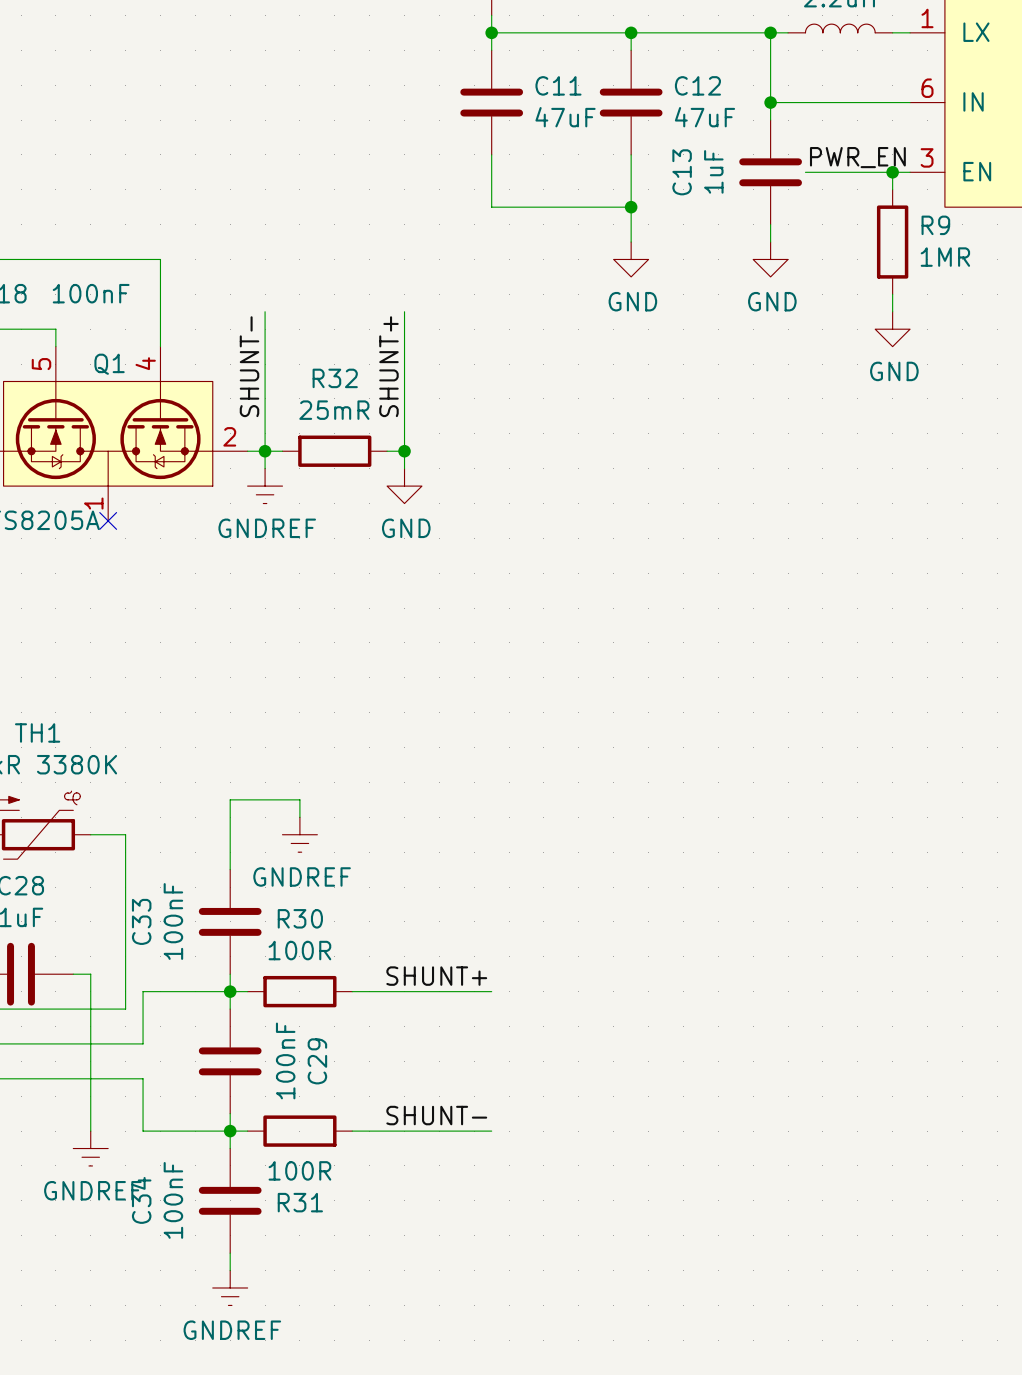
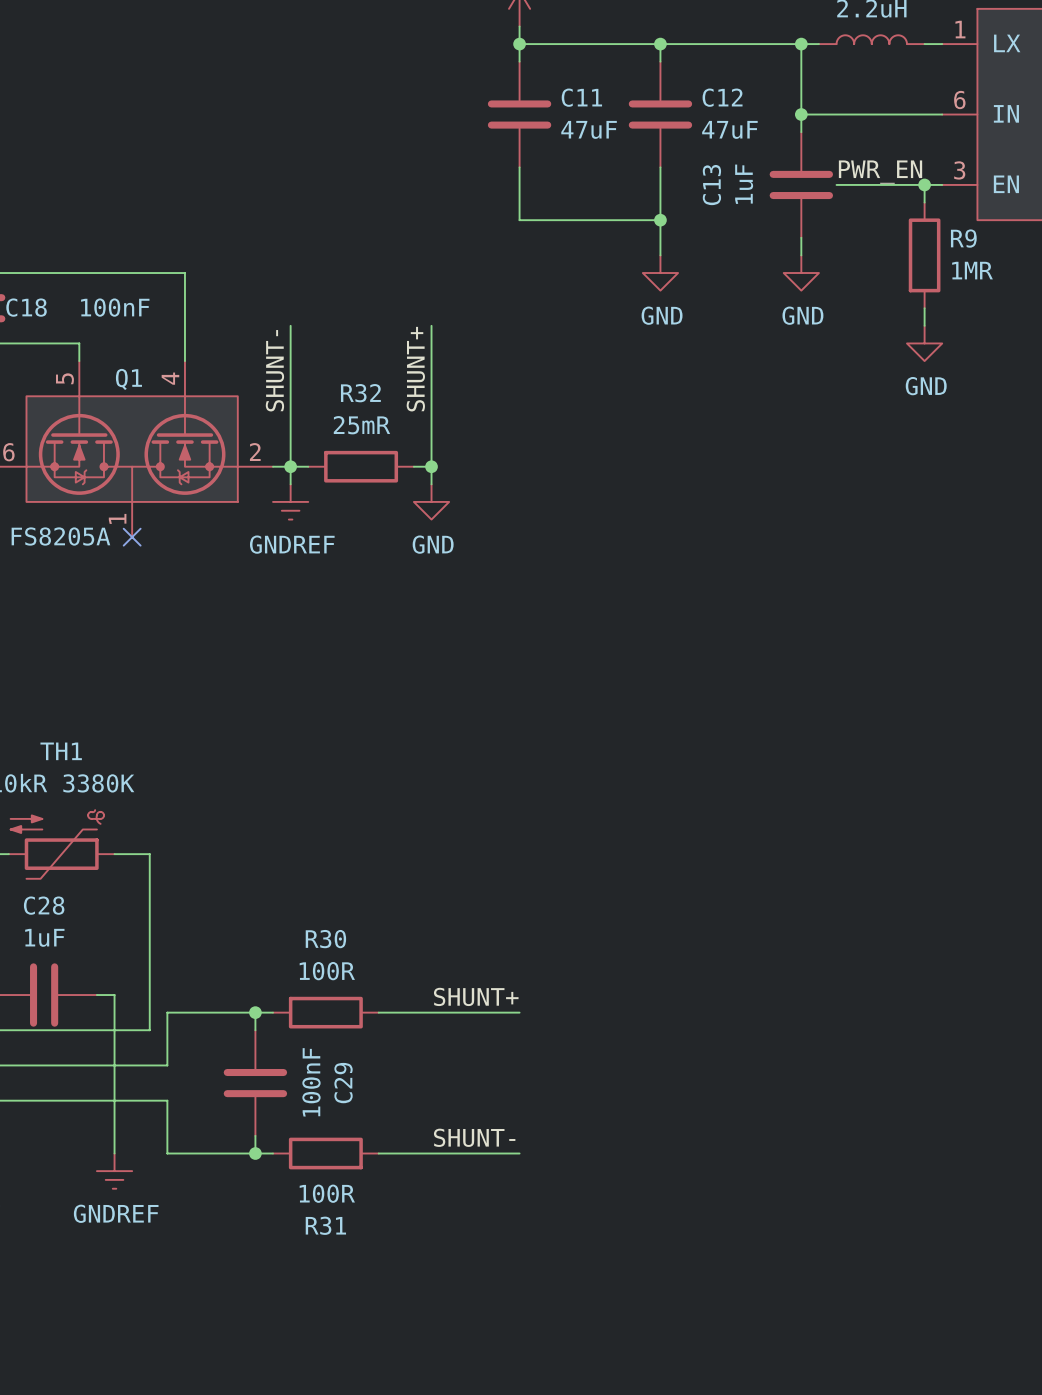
wire: (299, 817) (299, 799) (230, 799) (230, 869) -> none
power symbol: GNDREF (299, 834) -> none
C33: 100nF (230, 921) -> none
wire: (230, 974) (230, 991) -> none
wire: (230, 1131) (230, 1148) -> none
C34: 100nF (230, 1200) -> none
wire: (230, 1253) (230, 1270) -> none
power symbol: GNDREF (230, 1287) -> none

